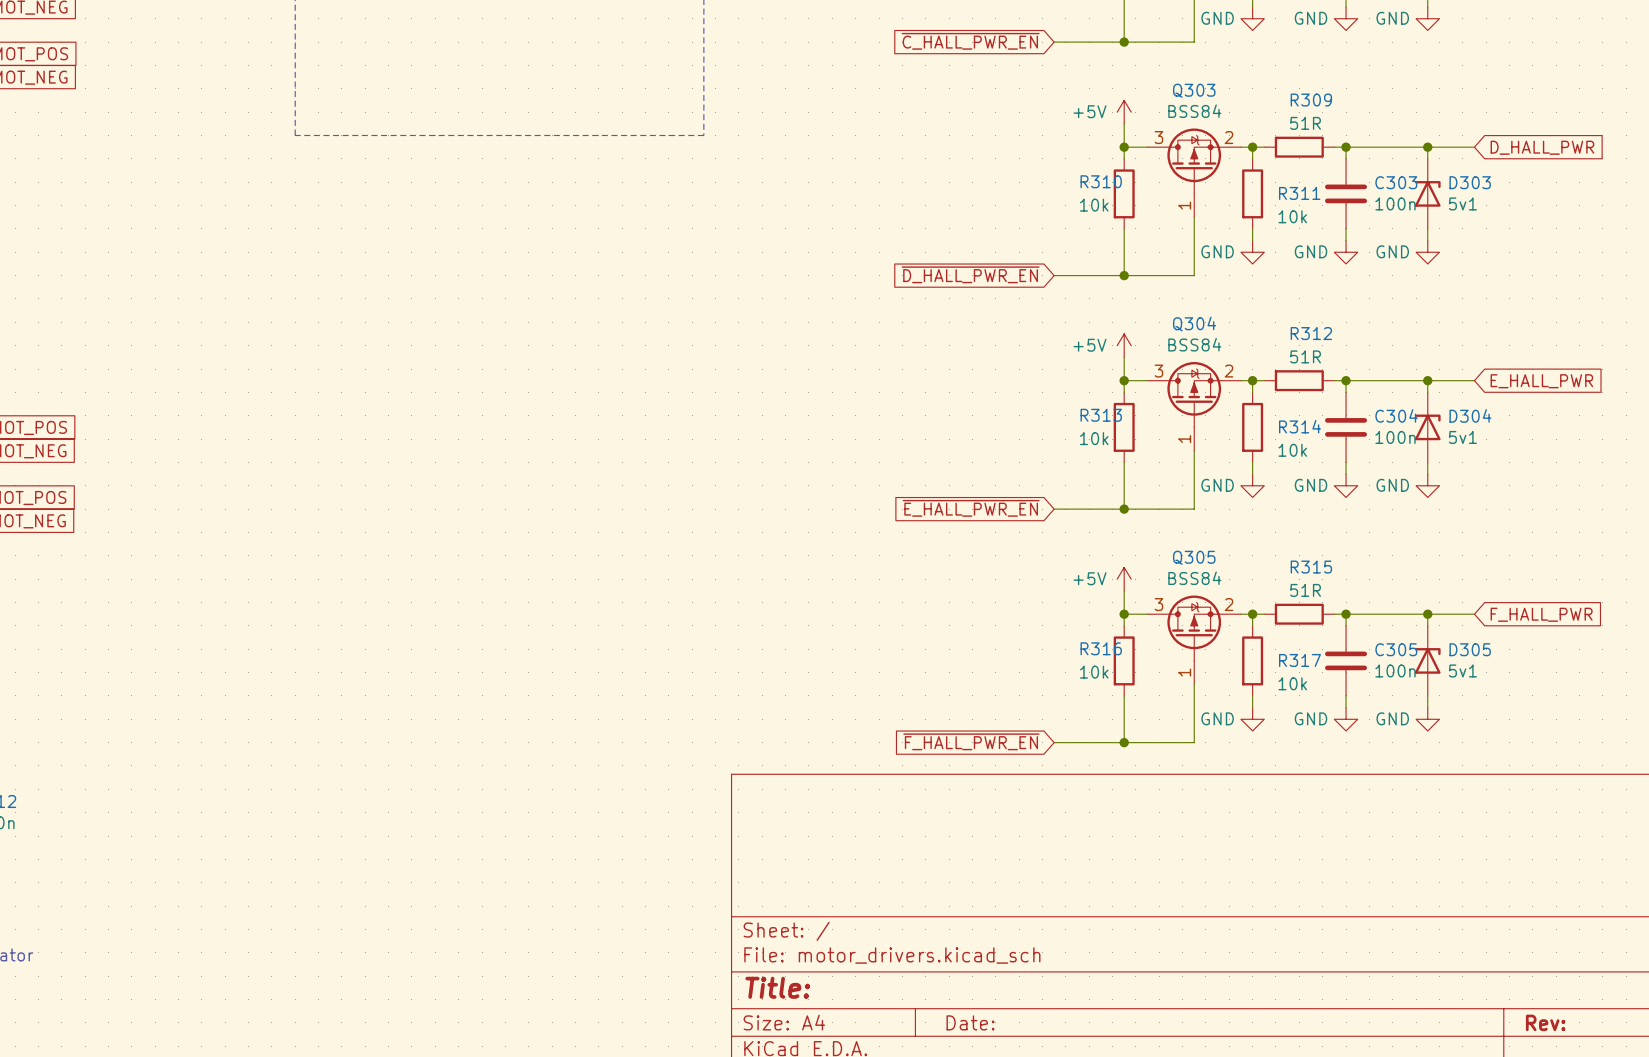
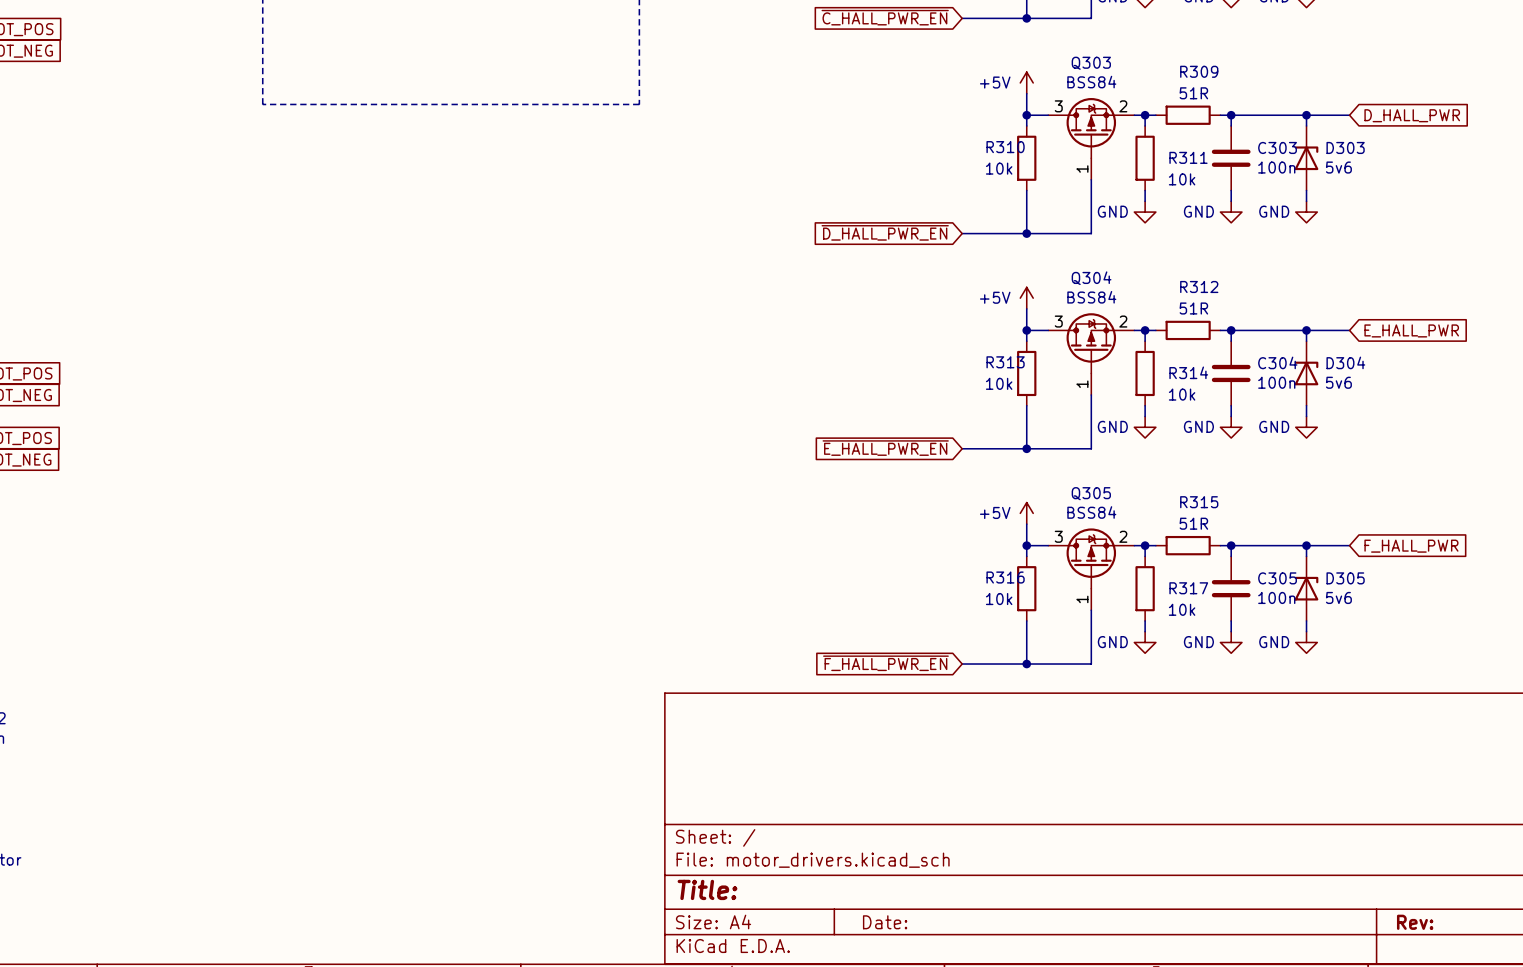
D303 value: 5v1 (1462, 203) -> 5v6 (1338, 167)
D304 value: 5v1 (1462, 437) -> 5v6 (1338, 382)
D305 value: 5v1 (1462, 670) -> 5v6 (1338, 597)

